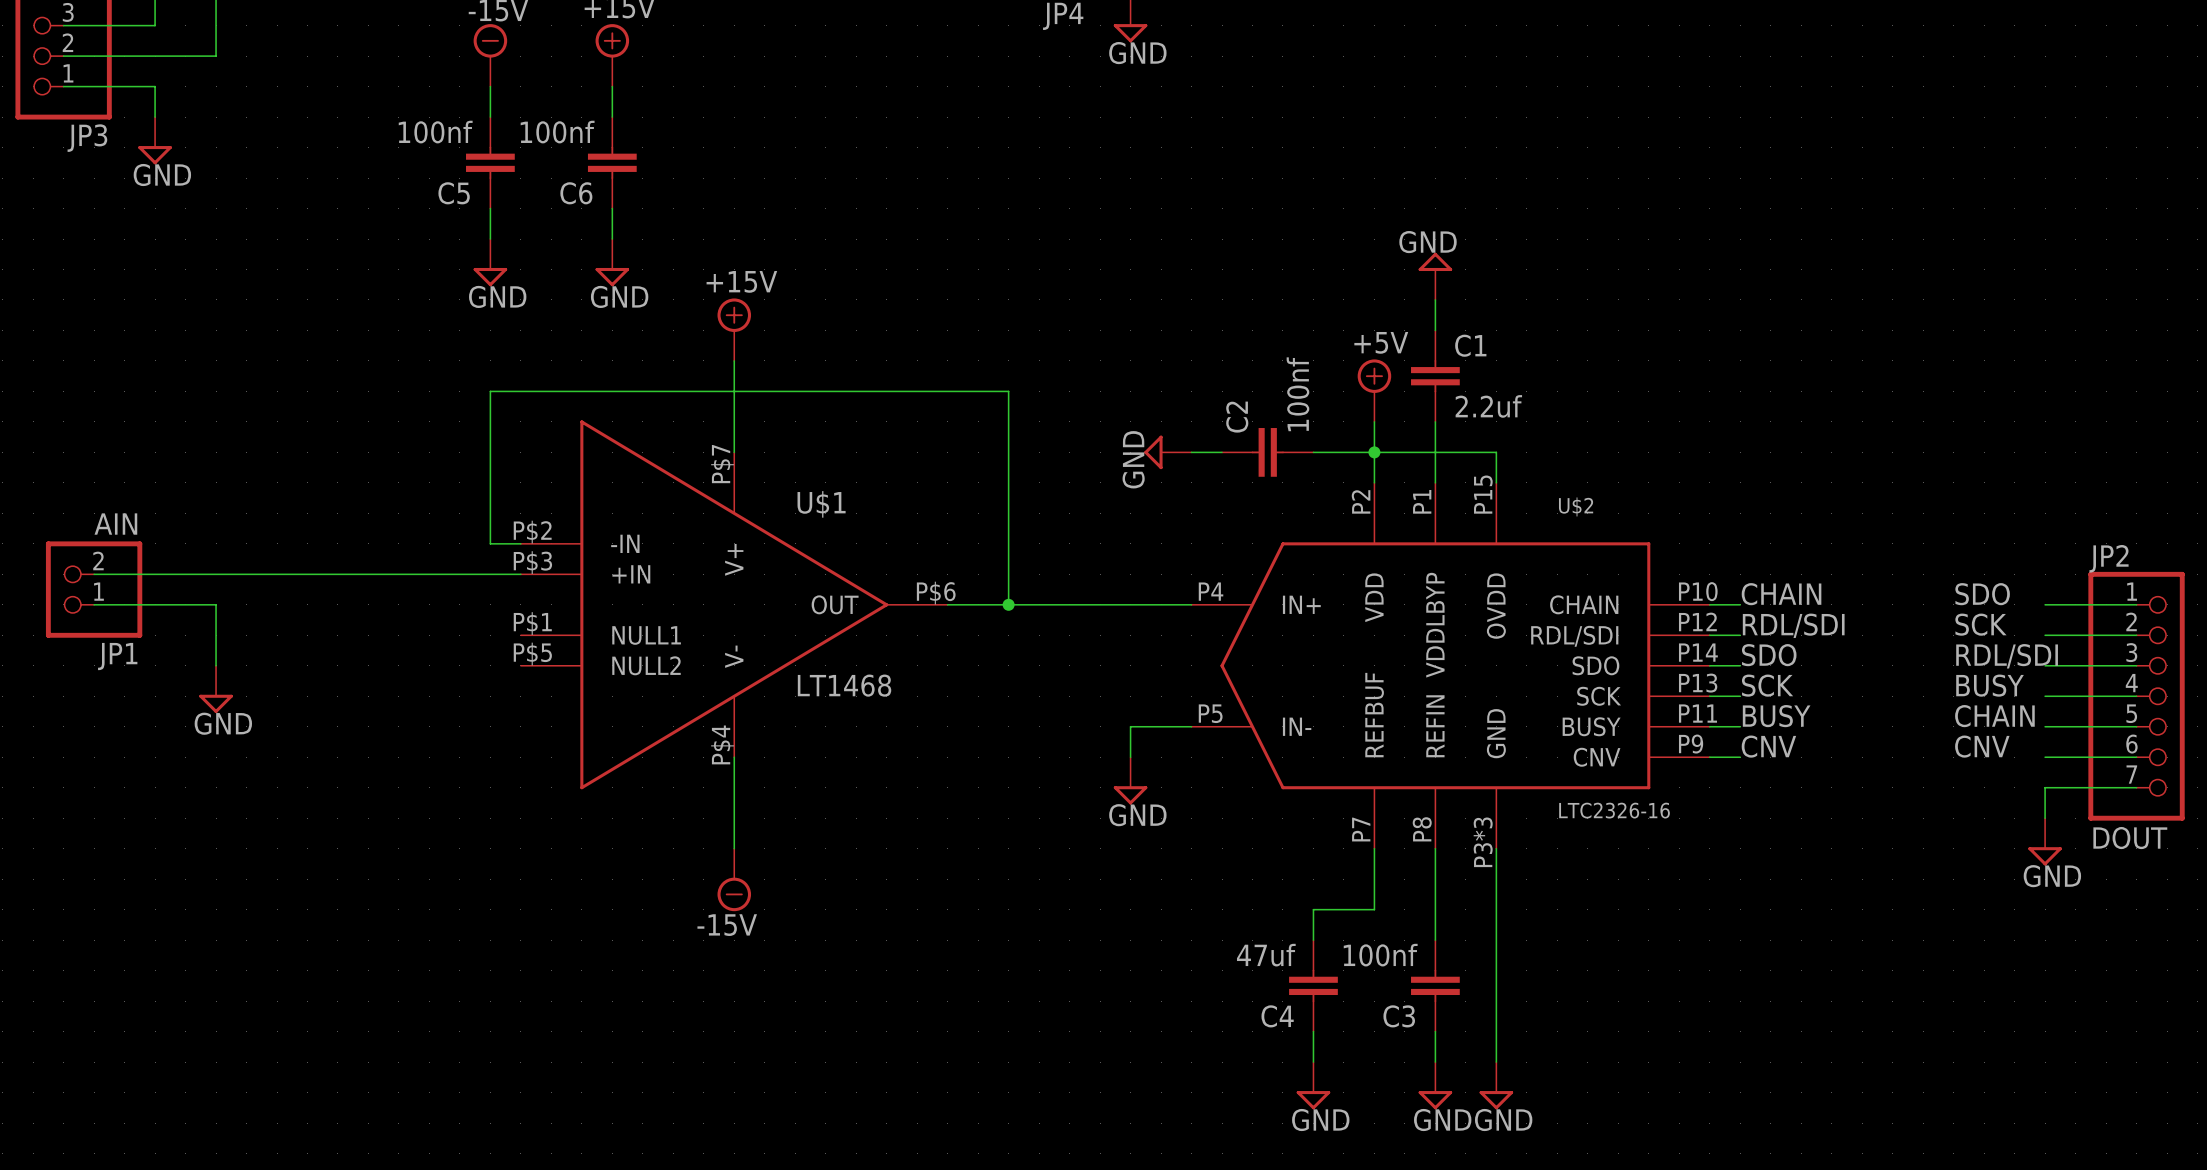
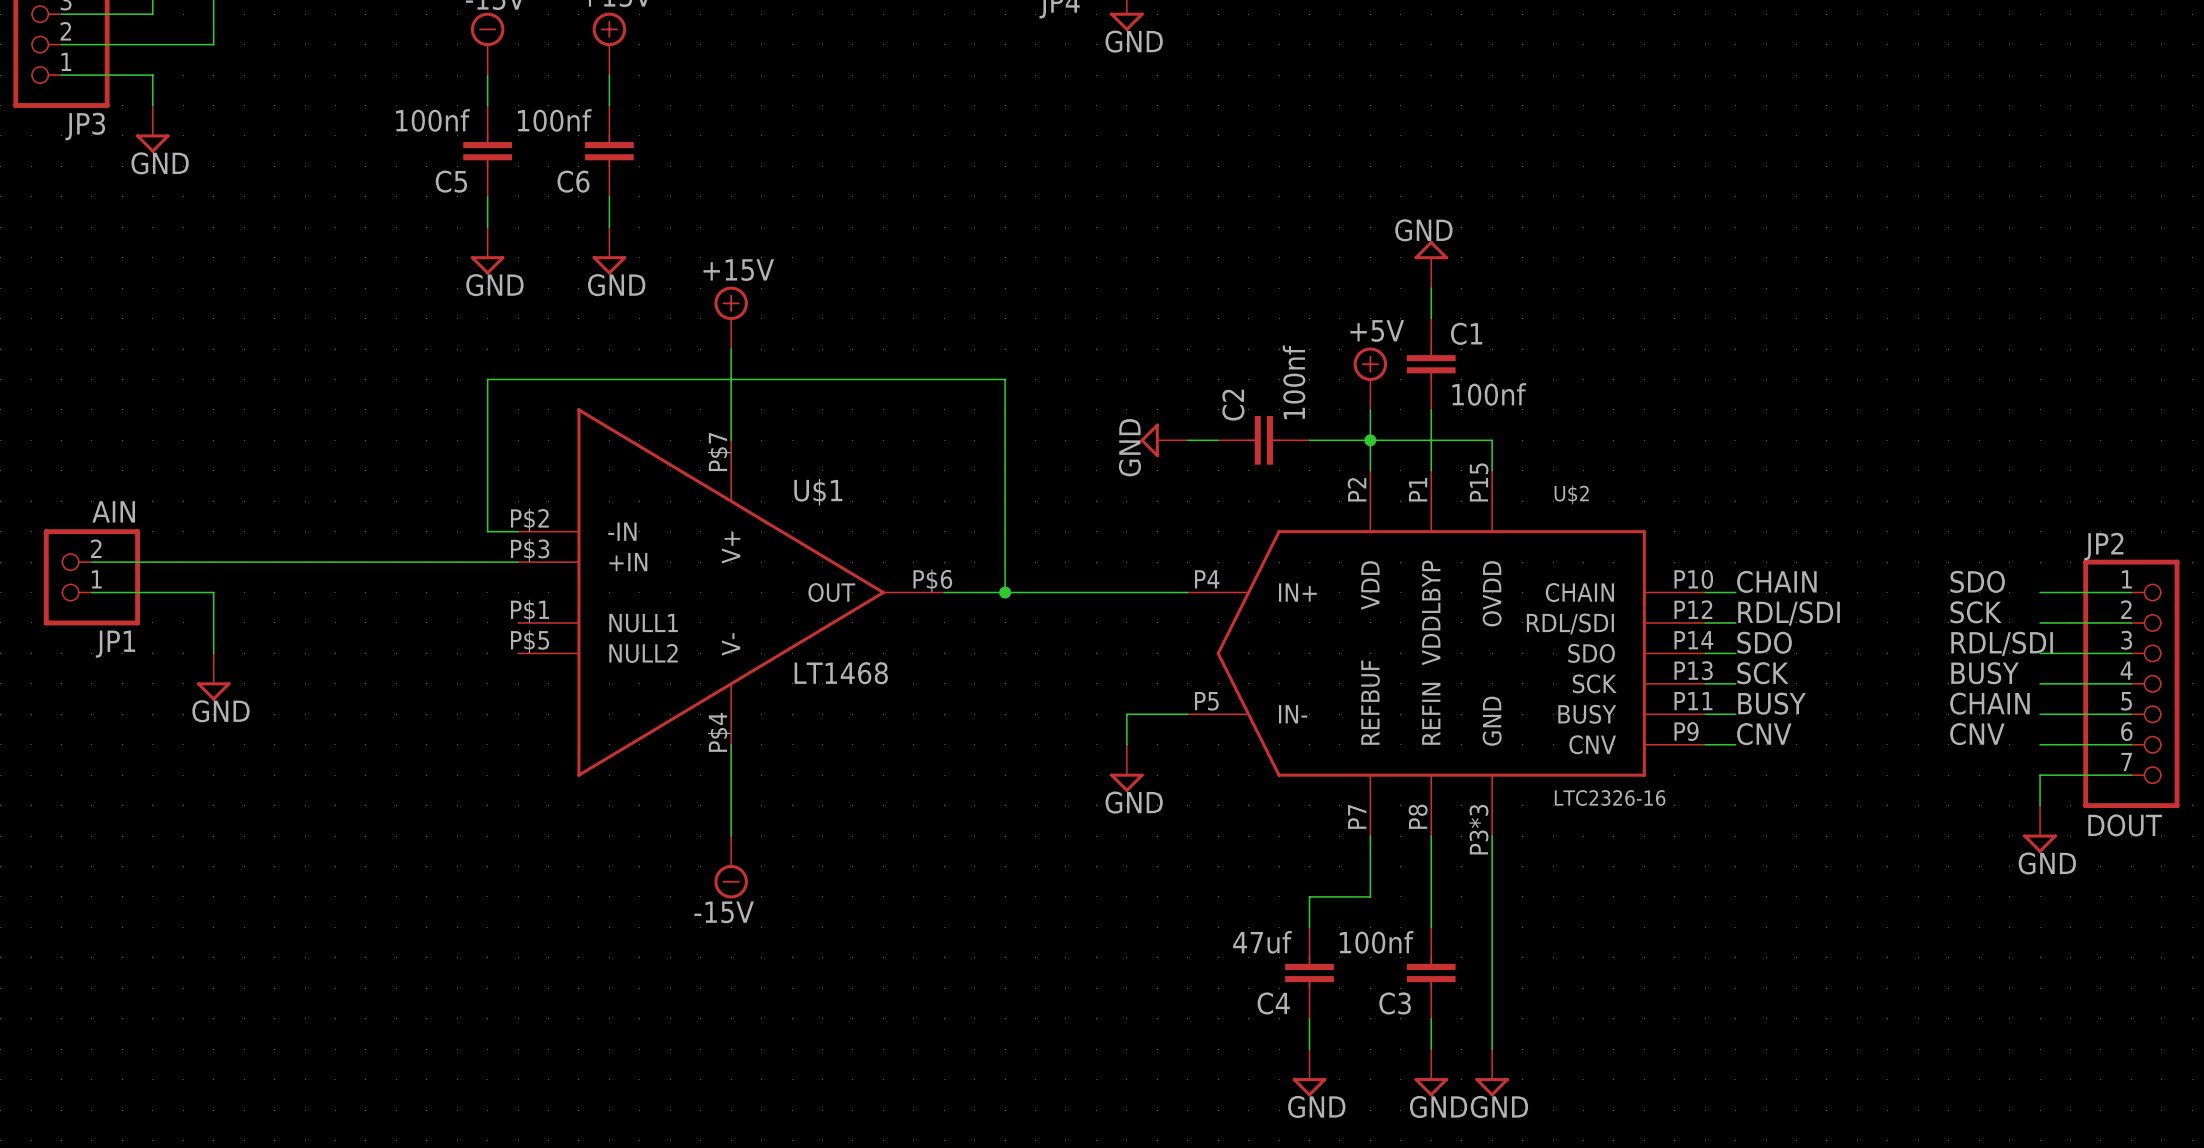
C1 value: 2.2uf (1488, 406) -> 100nf (1489, 394)

